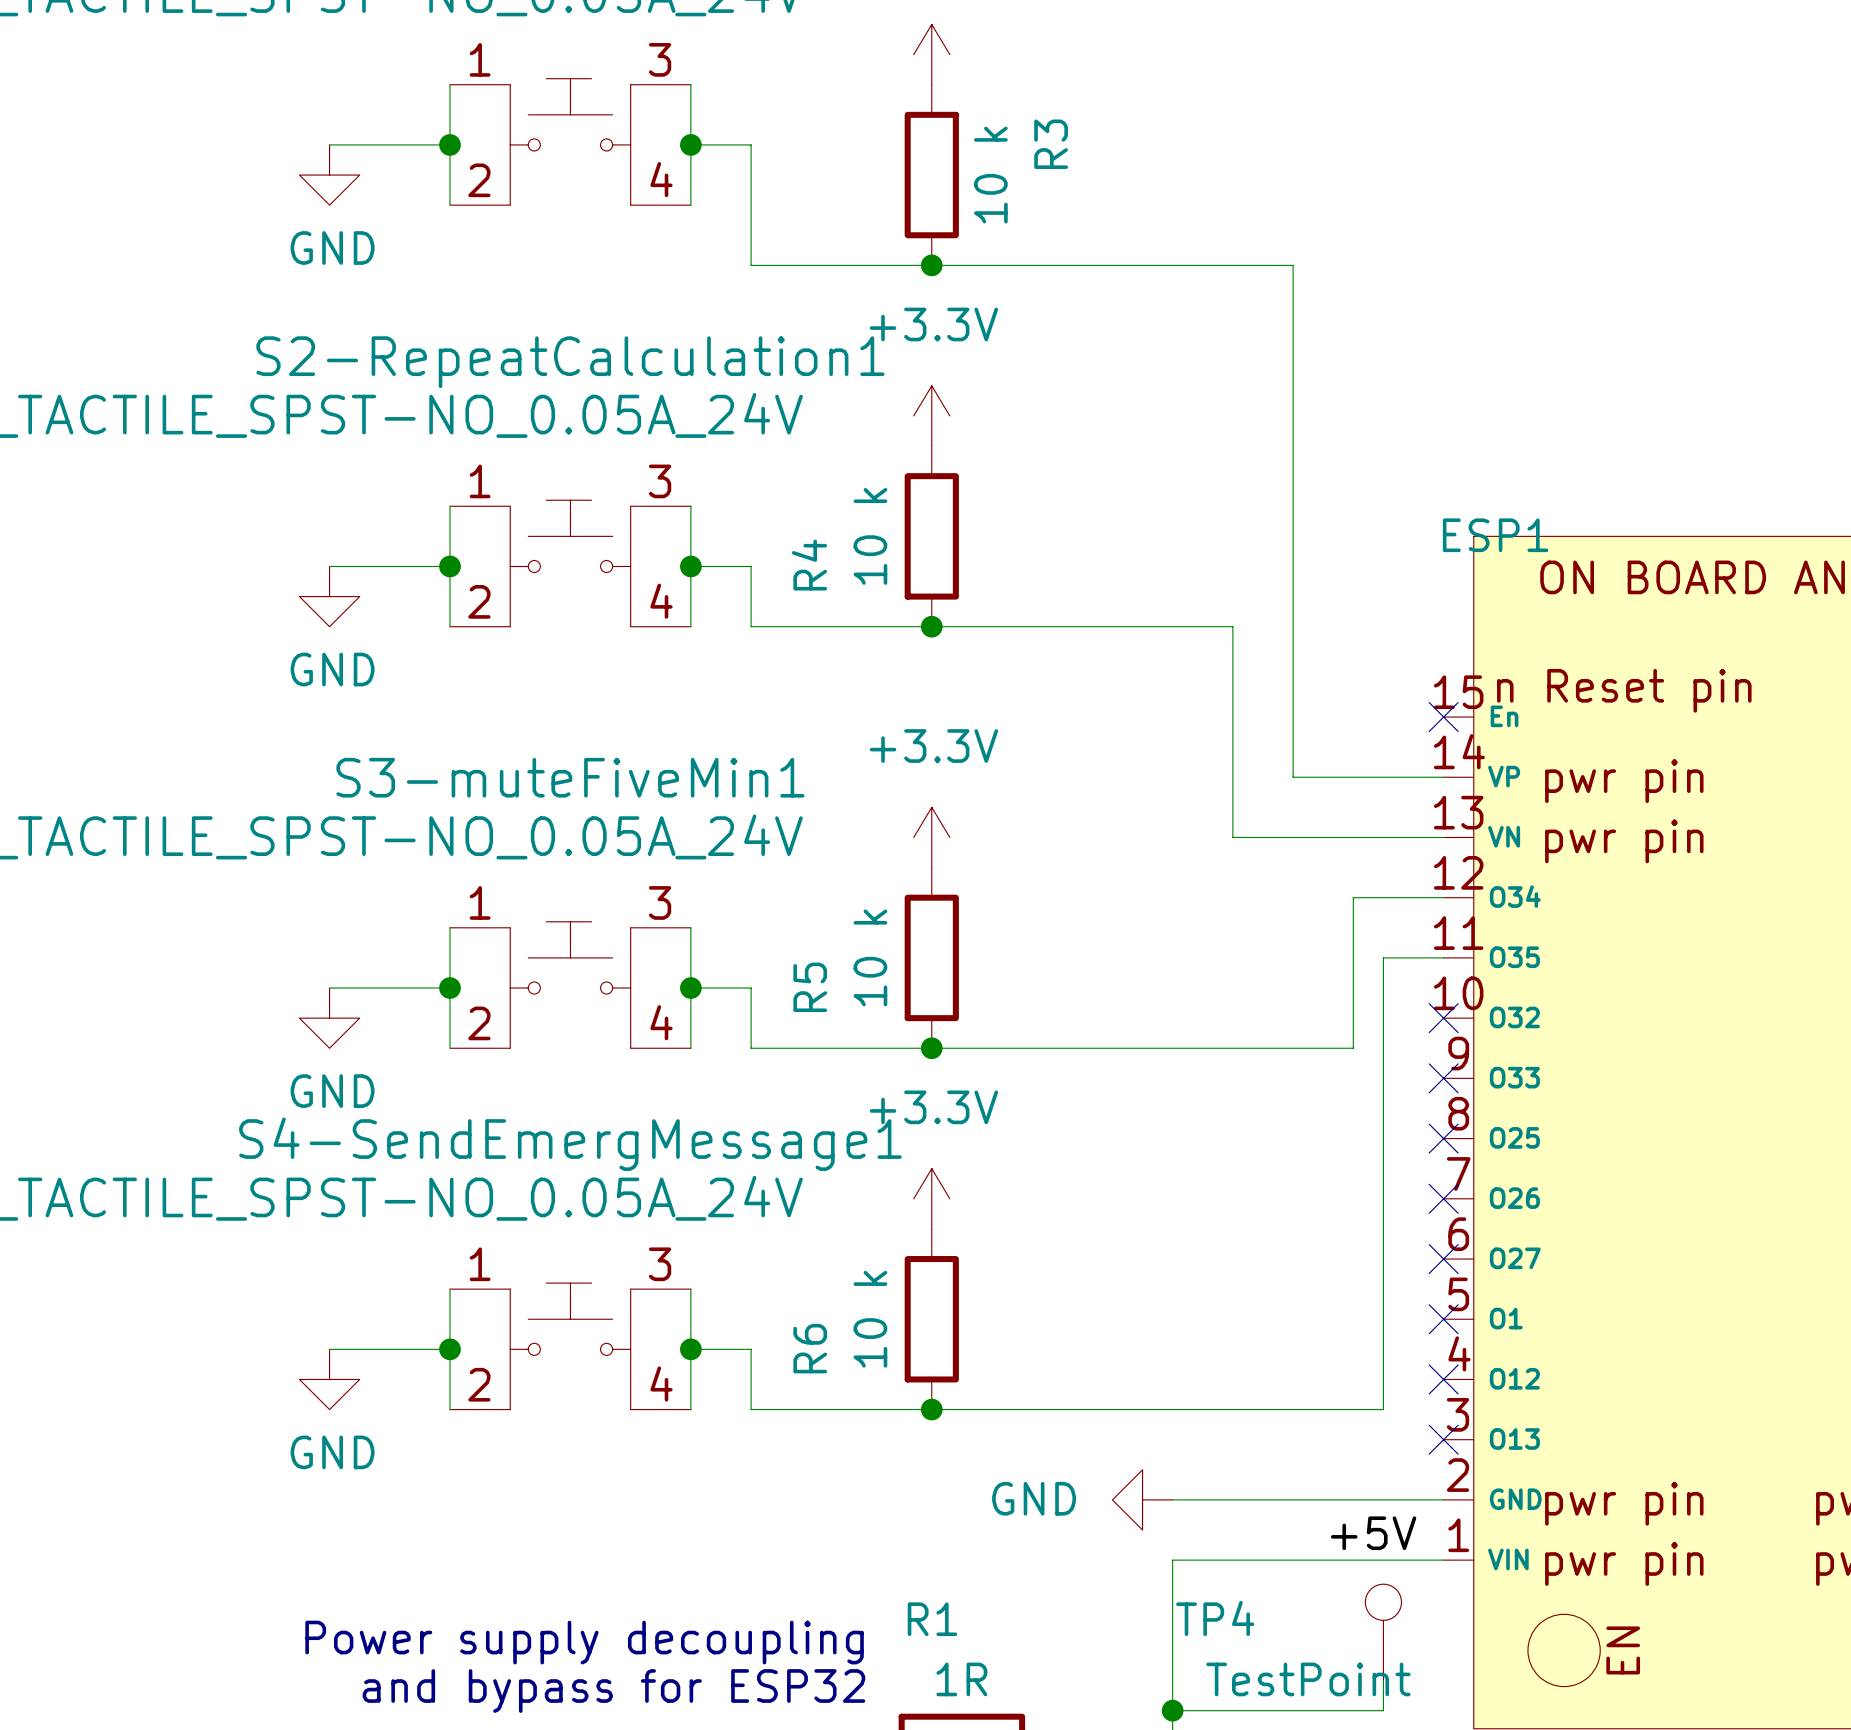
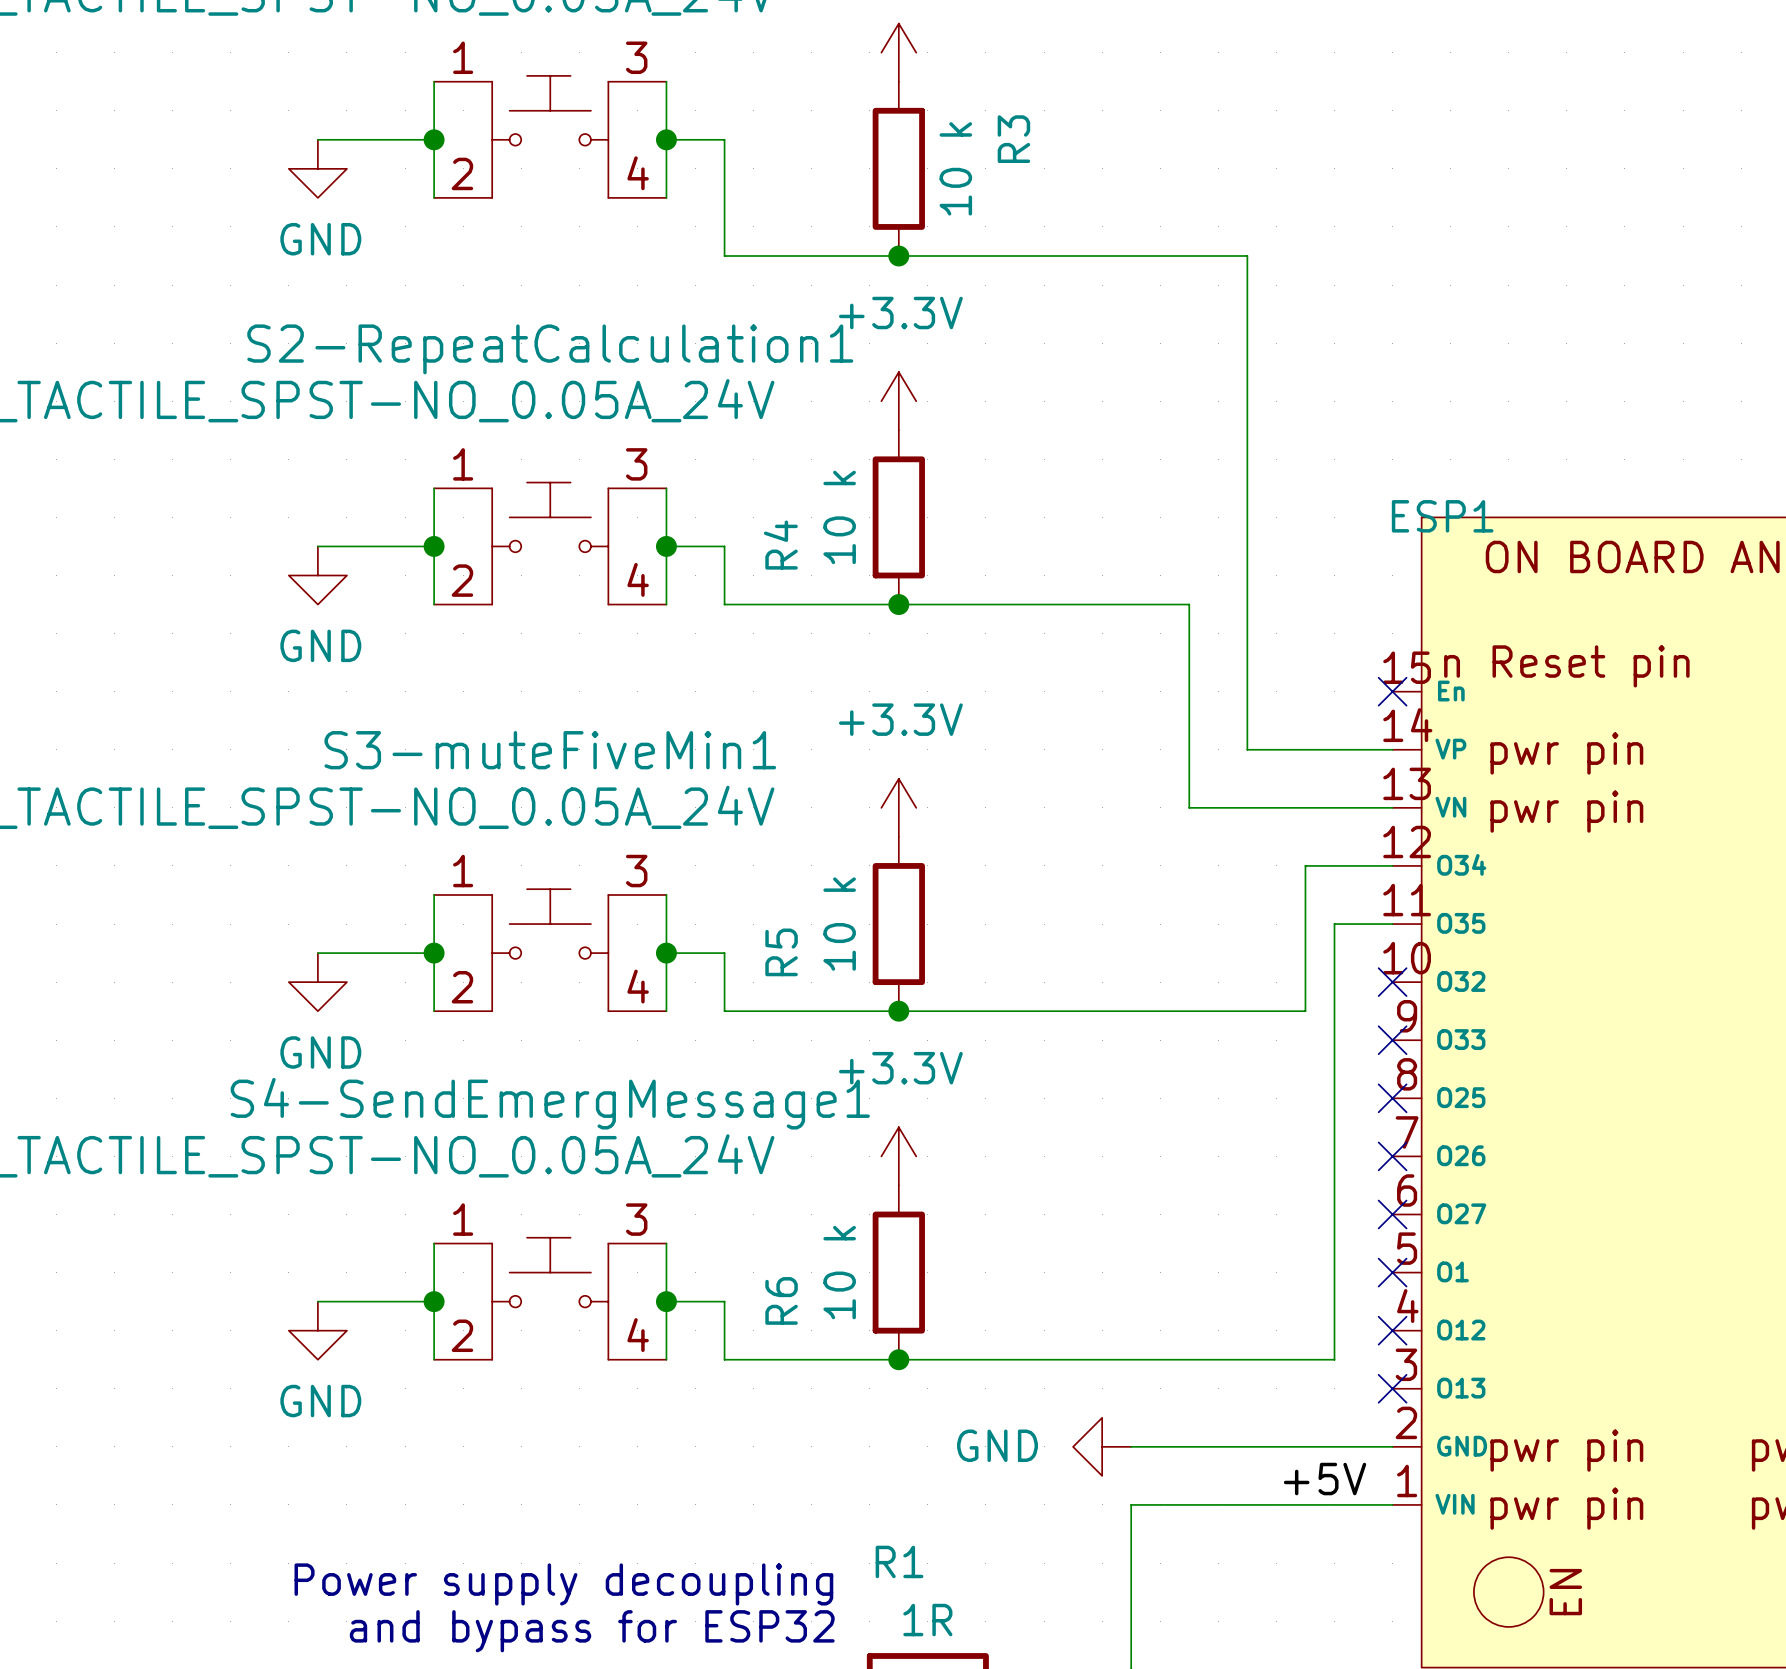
TP4: TestPoint (1383, 1632) -> none
wire: (1383, 1680) (1383, 1710) (1172, 1710) -> none
junction: (1172, 1710) -> none

